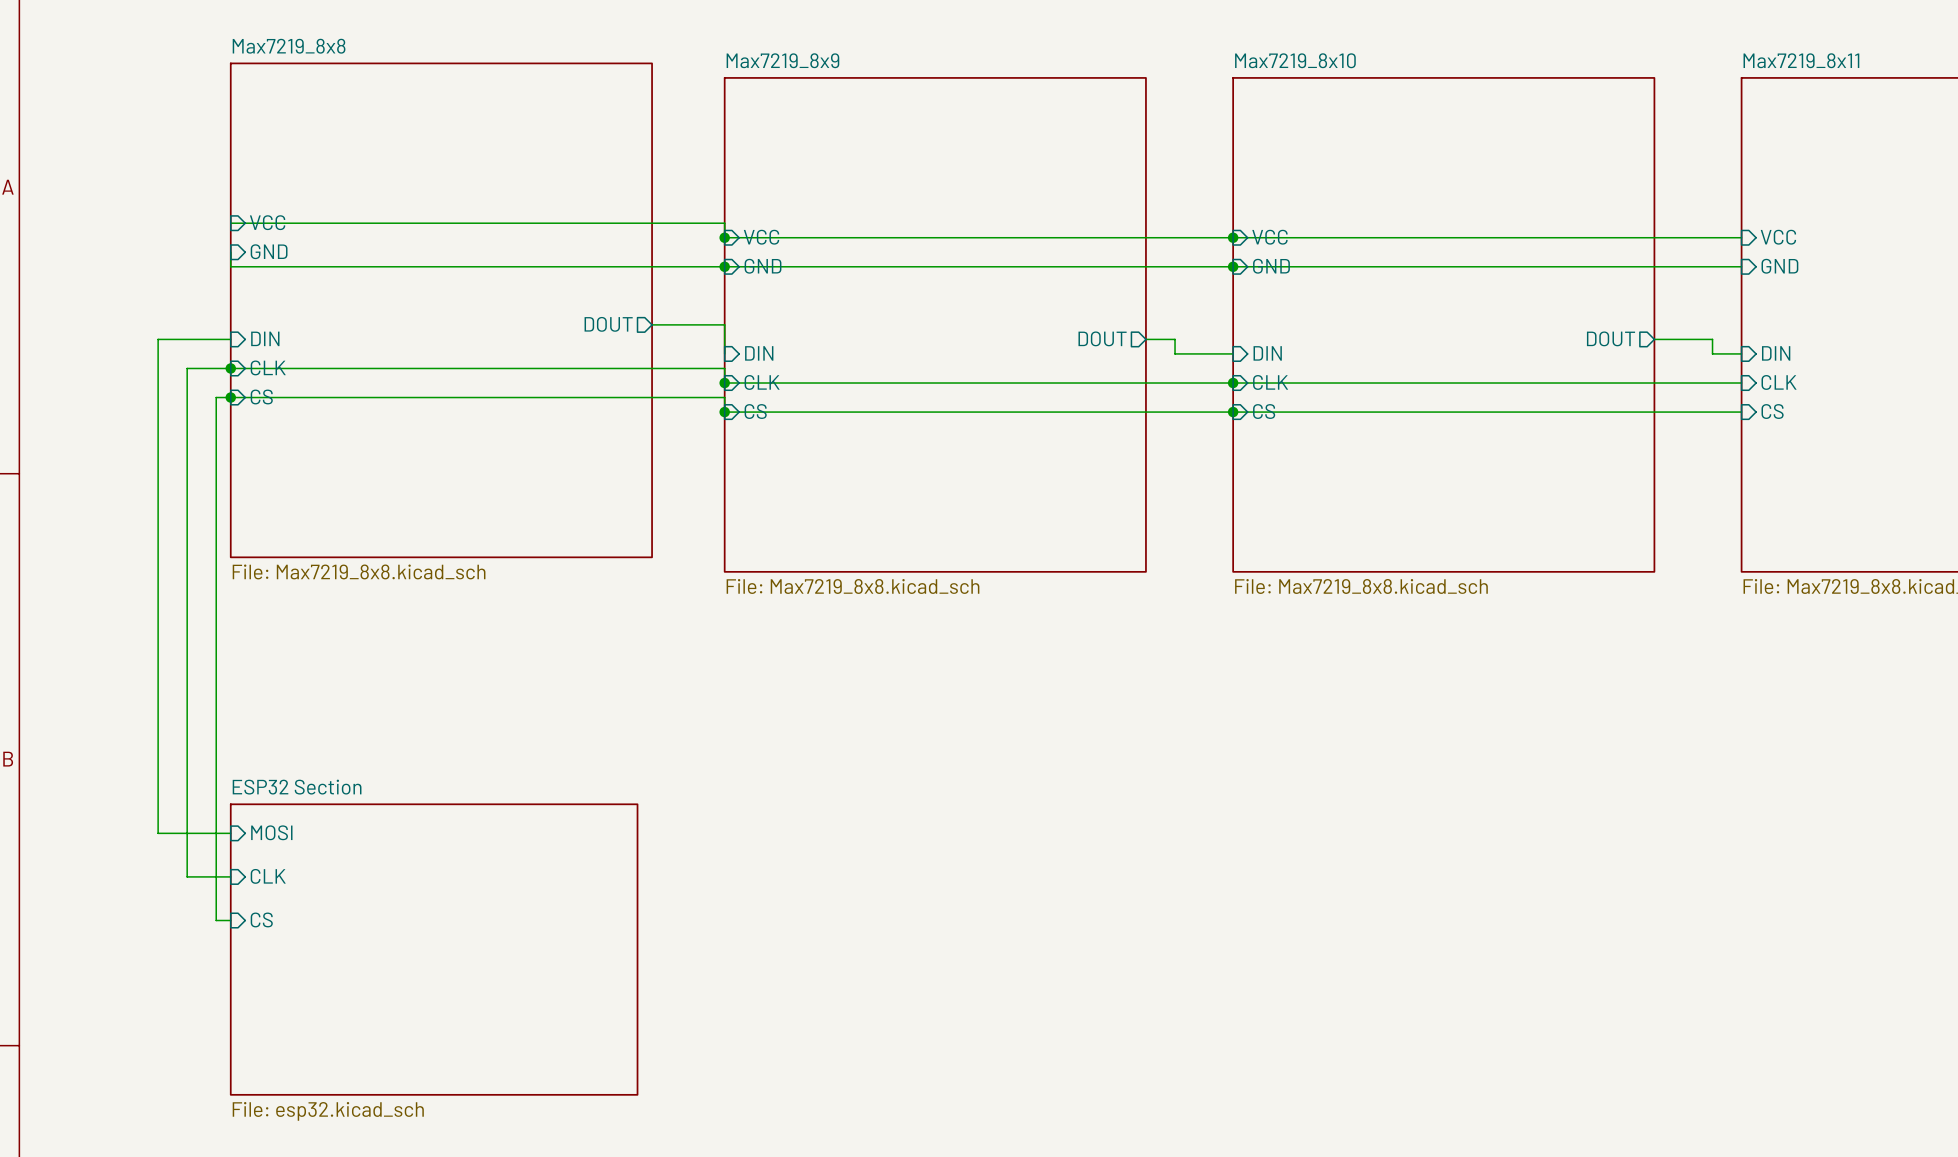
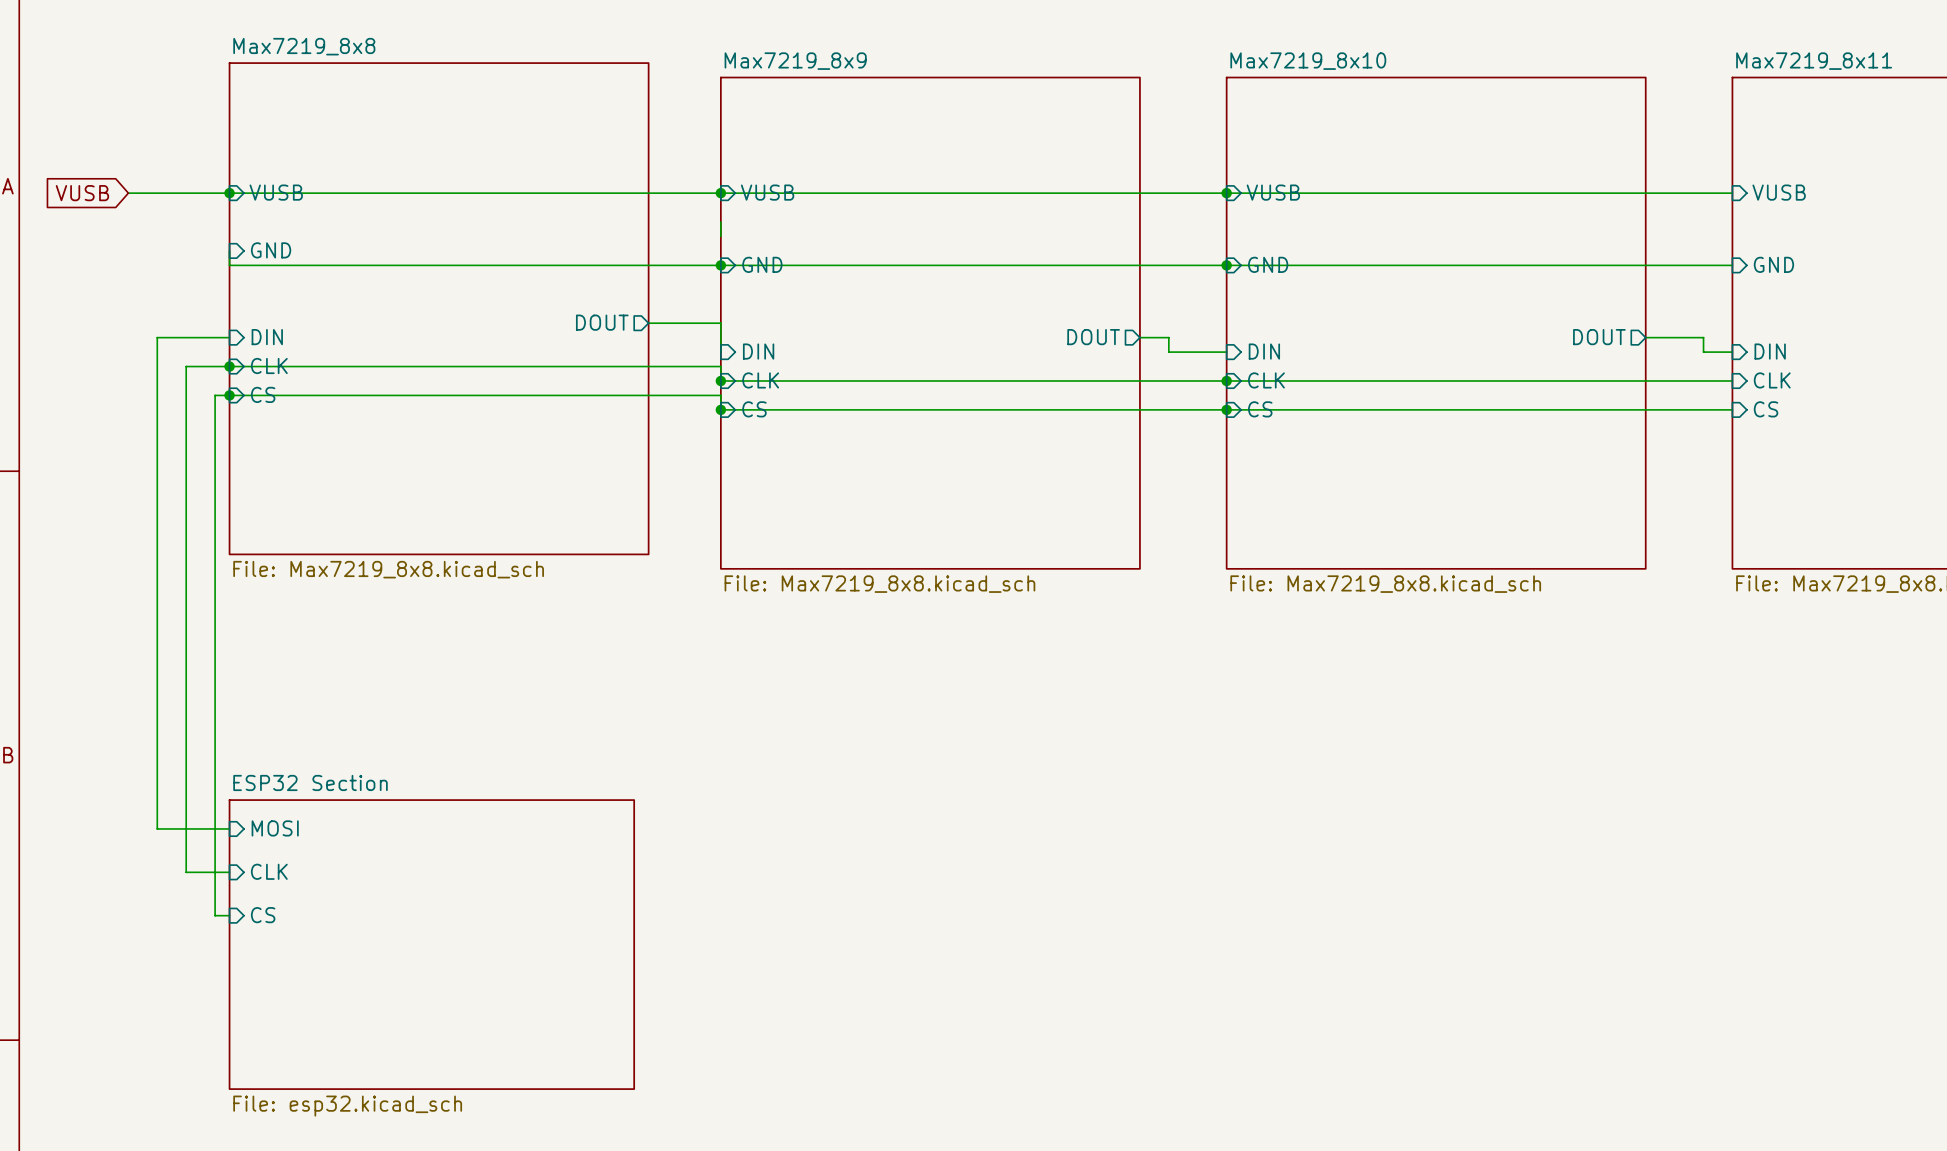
sheet pin: none -> VUSB (276, 192)
sheet pin: none -> VUSB (767, 192)
sheet pin: none -> VUSB (1273, 192)
sheet pin: none -> VUSB (1779, 192)
global label: none -> VUSB (82, 193)
wire: none -> (128, 193) (1732, 193)
junction: none -> (229, 193)
sheet pin: VCC (267, 222) -> none
wire: (230, 223) (724, 223) -> none
wire: (724, 237) (1741, 237) -> none
junction position: (724, 237) -> (720, 193)
sheet pin: VCC (761, 237) -> none
junction position: (1233, 237) -> (1226, 193)
sheet pin: VCC (1269, 237) -> none
sheet pin: VCC (1778, 237) -> none

